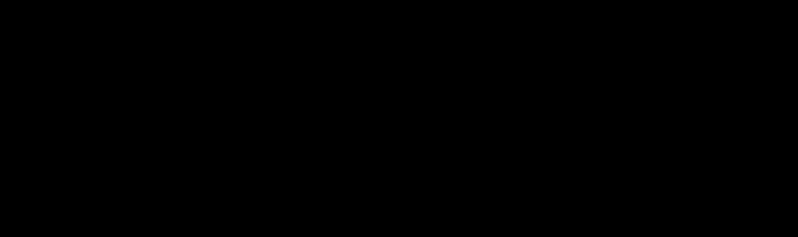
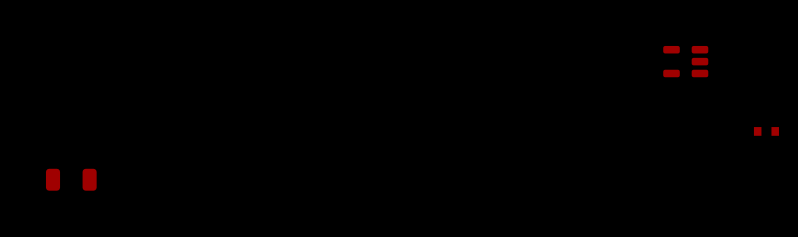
part: none -> (685, 61)
part: none -> (766, 131)
part: none -> (71, 179)

